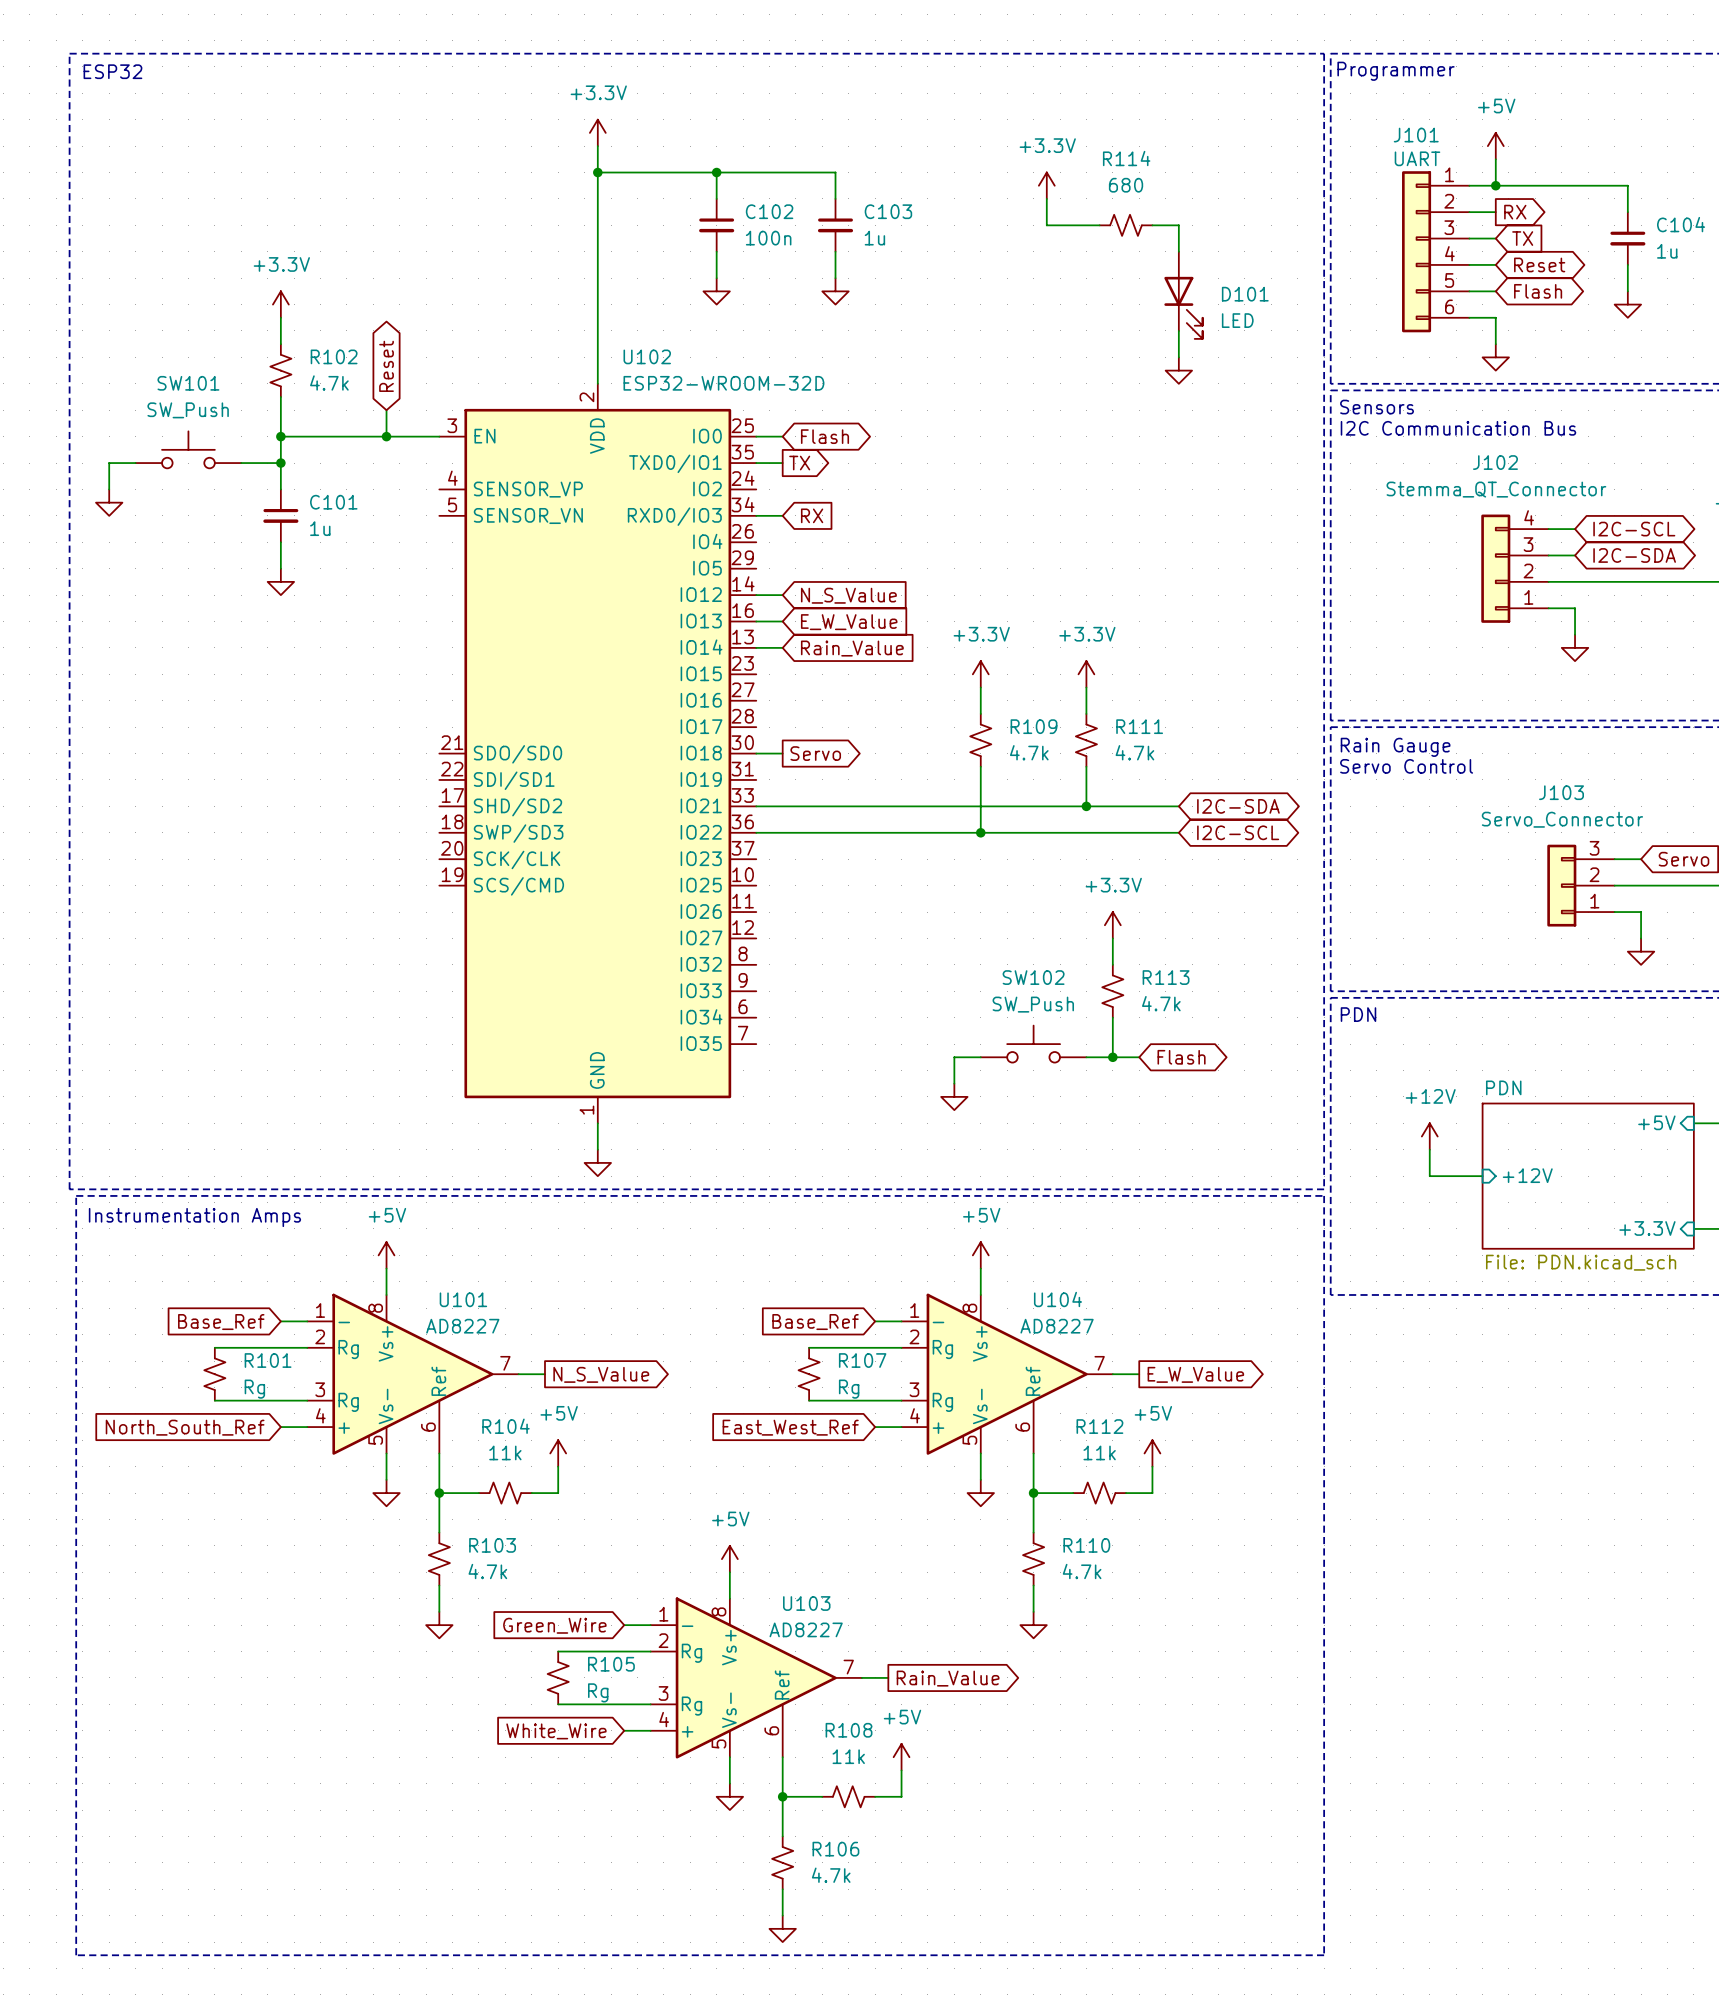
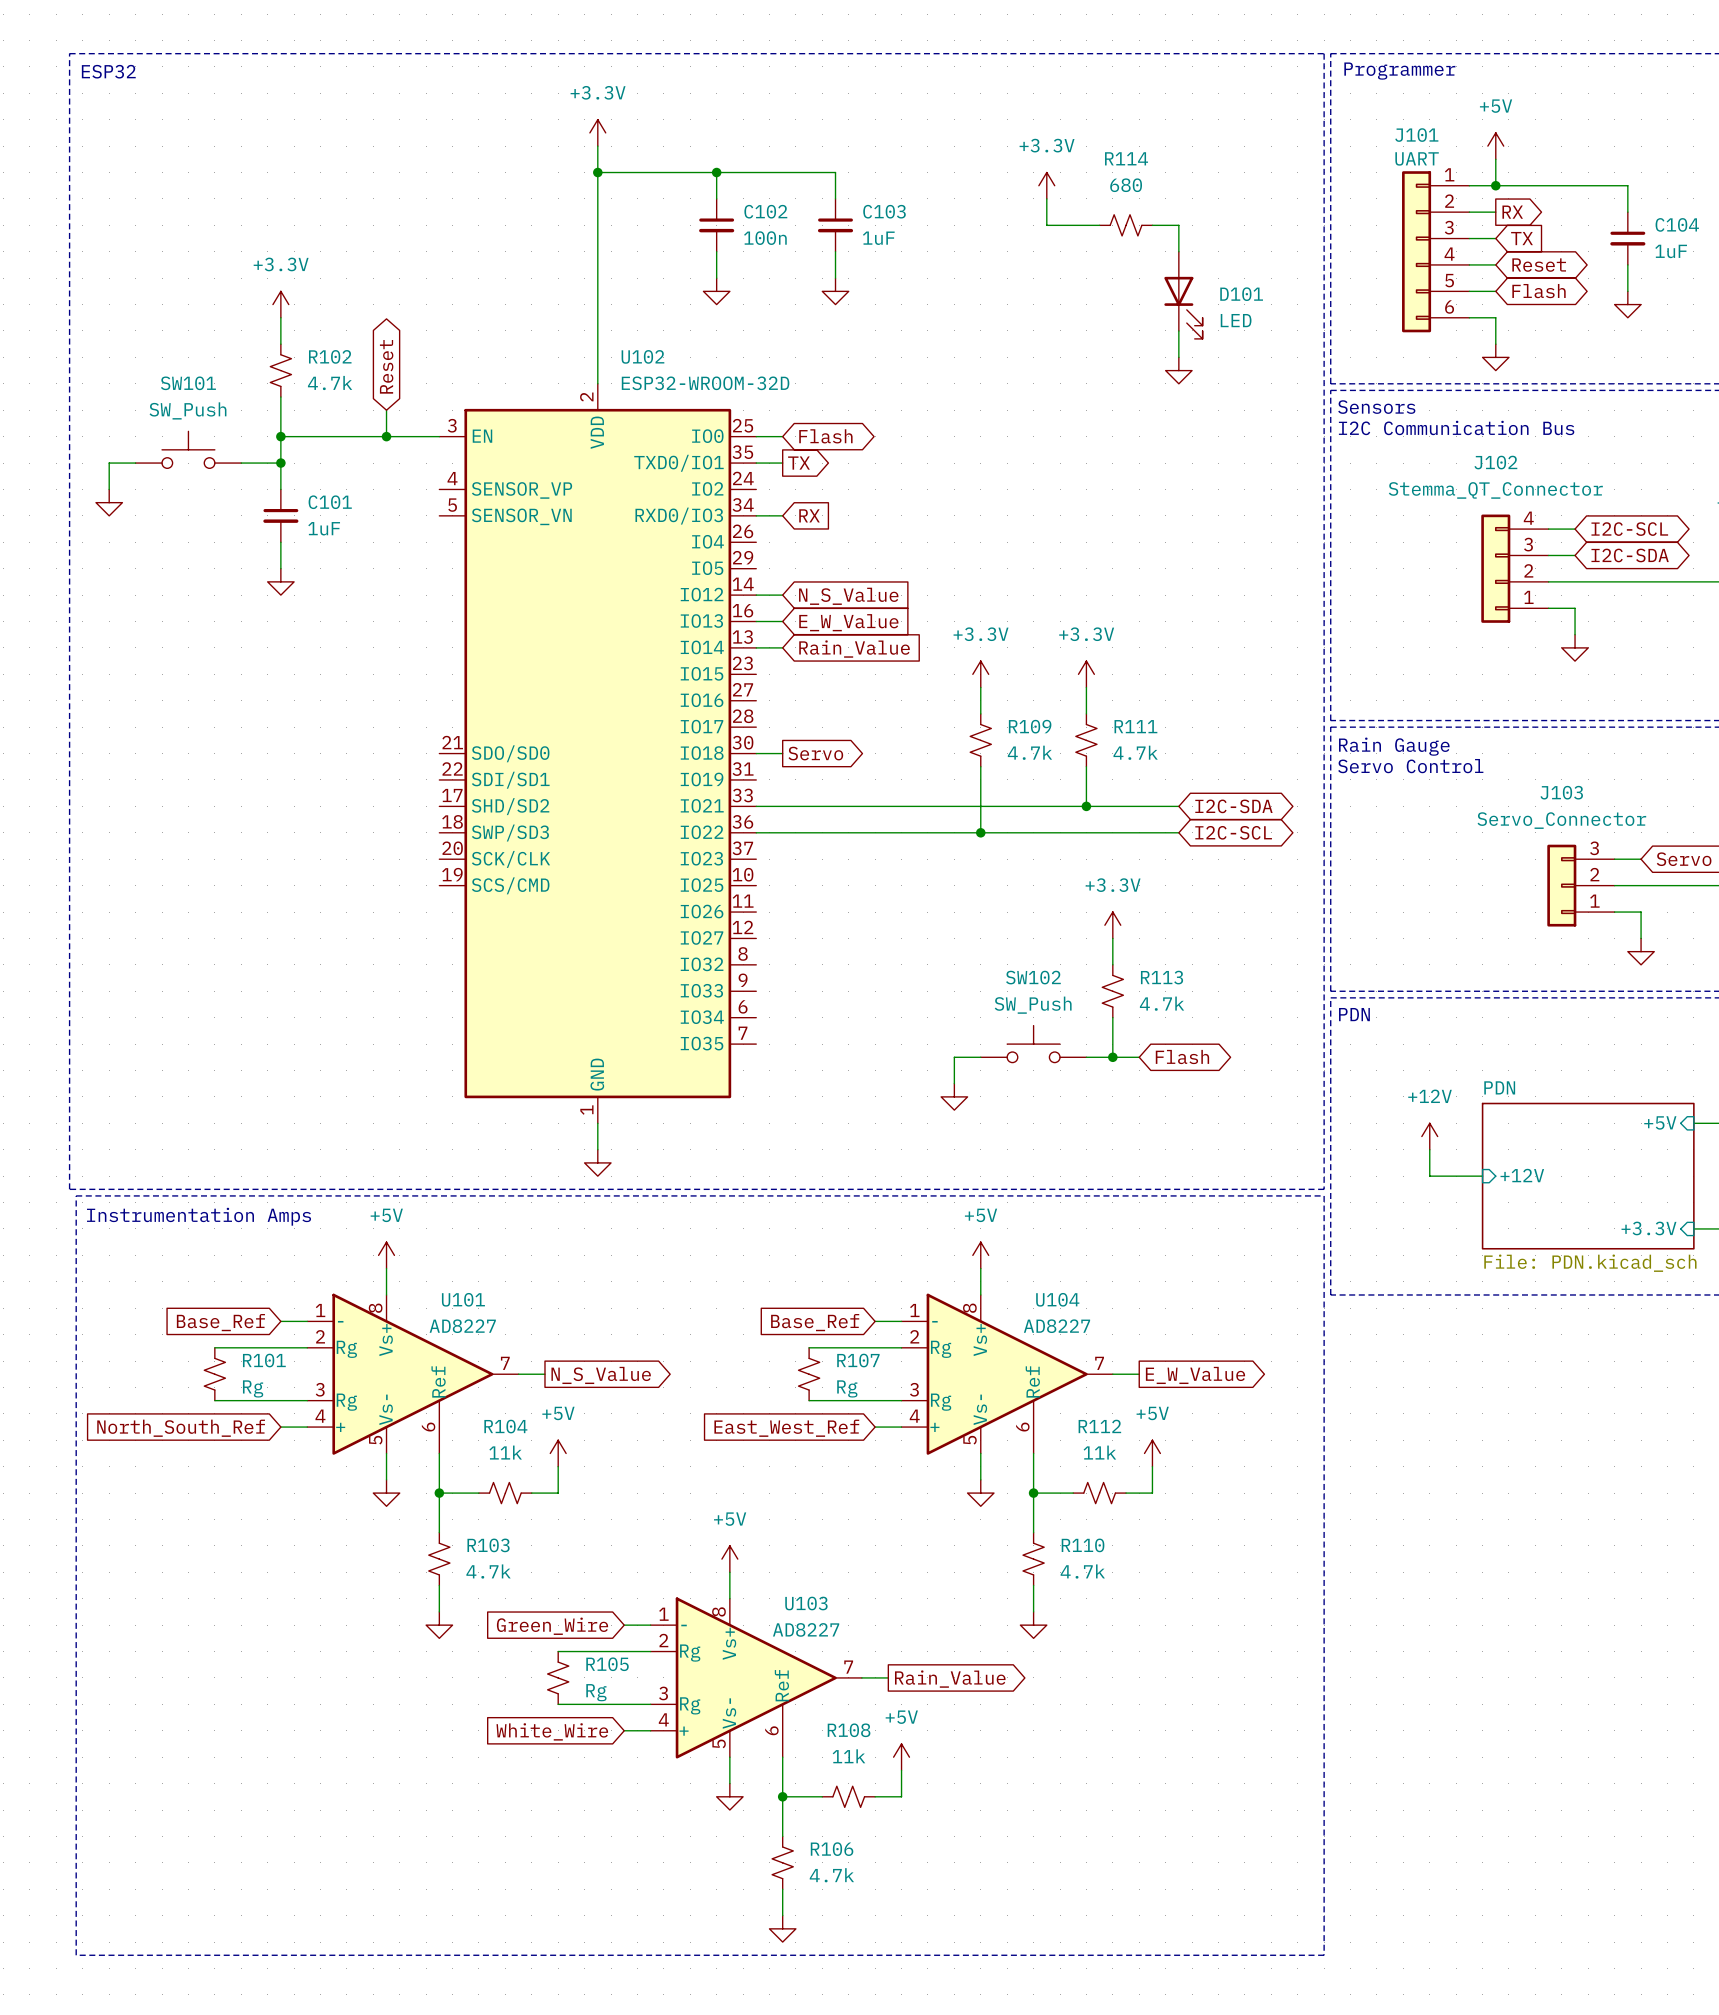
C103 value: 1u (874, 238) -> 1uF (878, 238)
C104 value: 1u (1667, 251) -> 1uF (1671, 251)
C101 value: 1u (320, 528) -> 1uF (324, 528)

